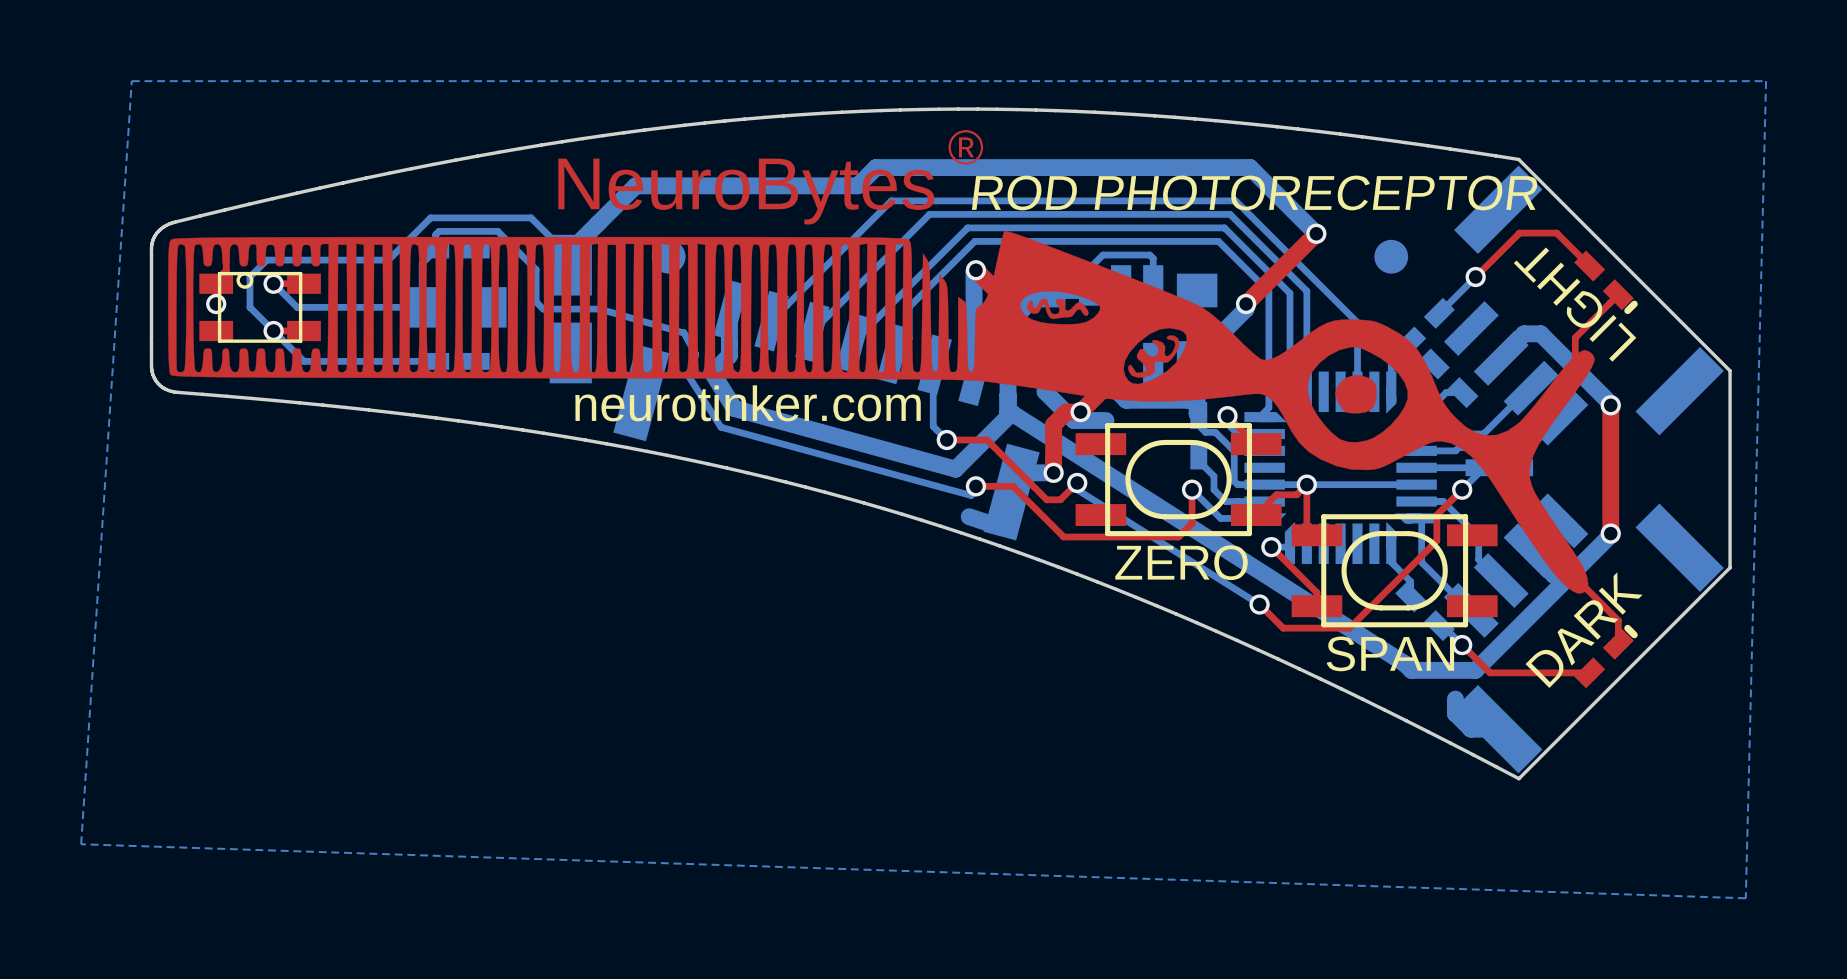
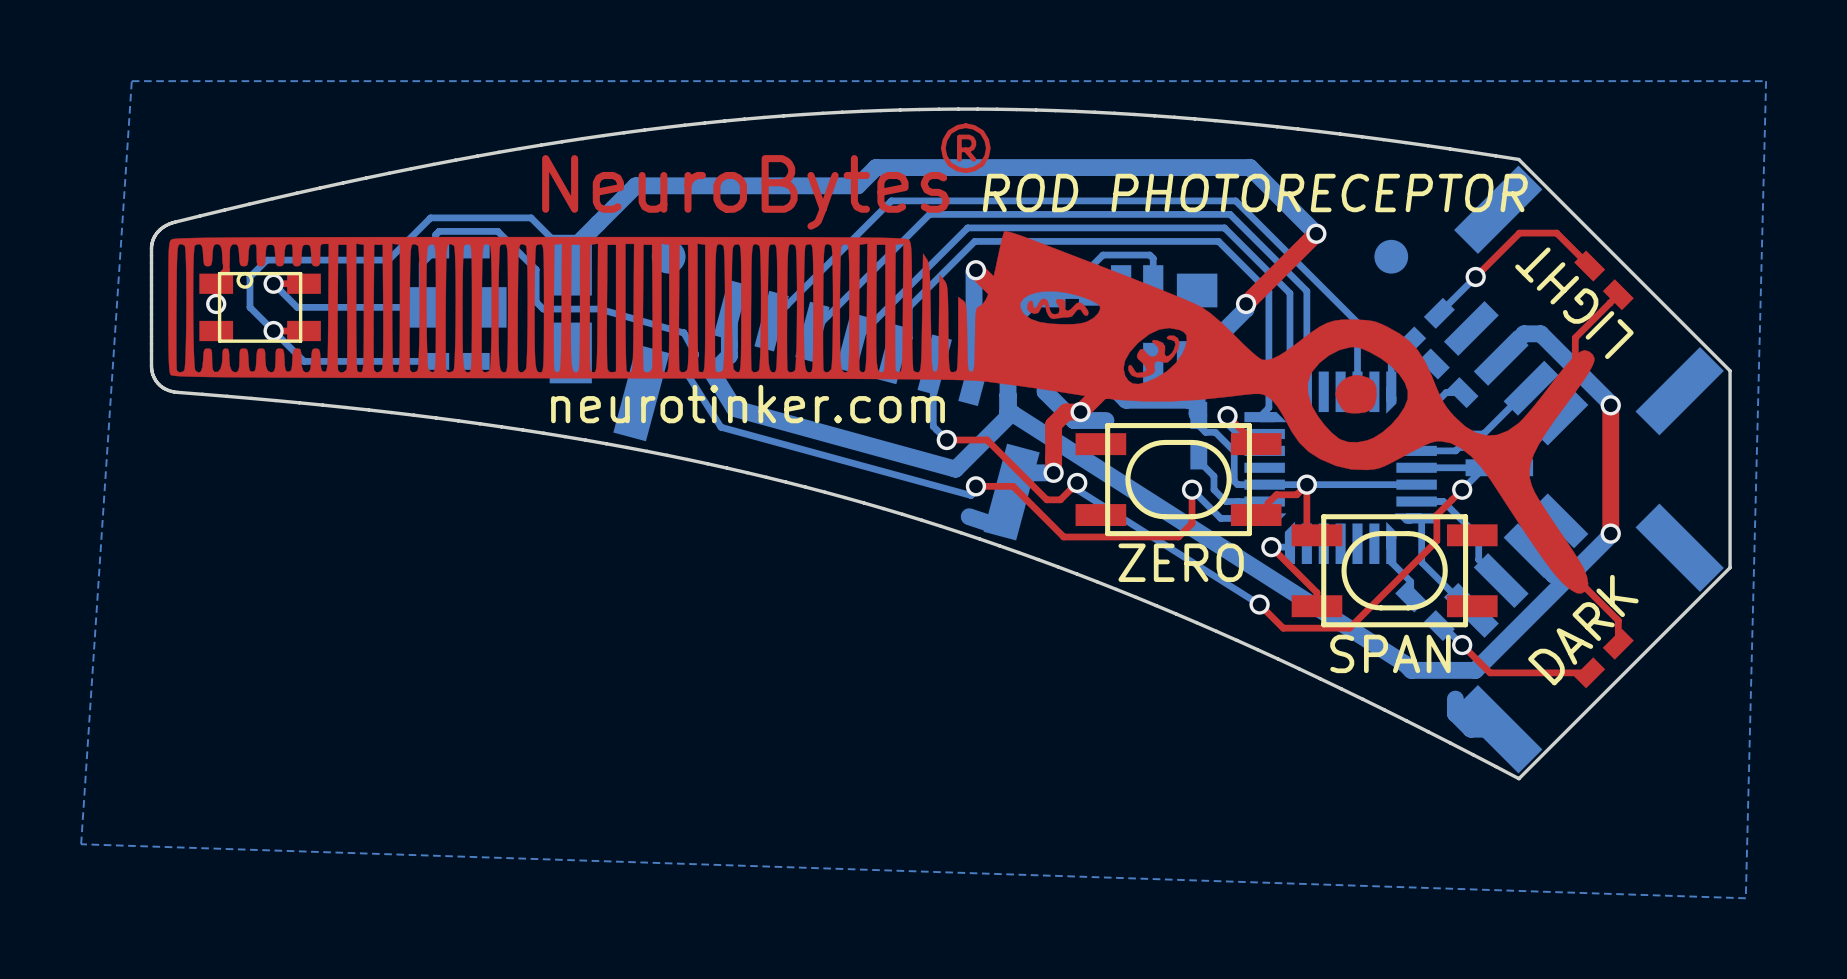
line: (1634, 304) (1627, 310) -> none
line: (1627, 628) (1634, 634) -> none

